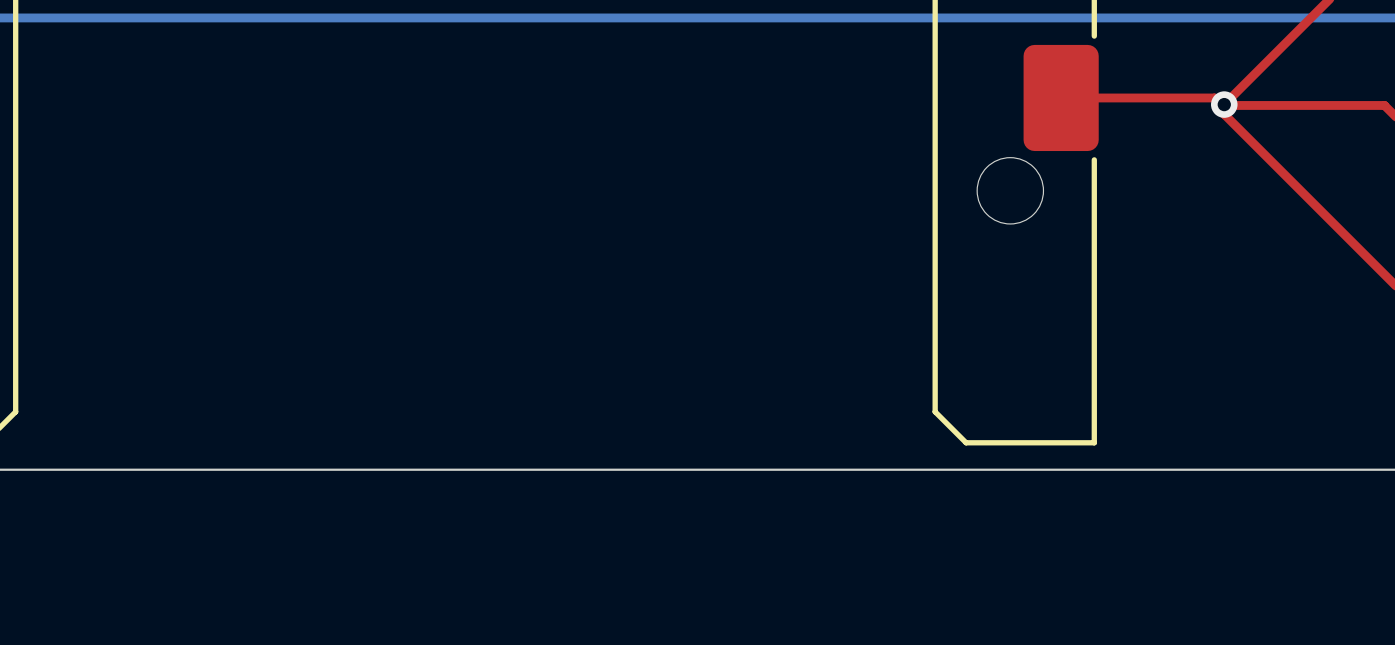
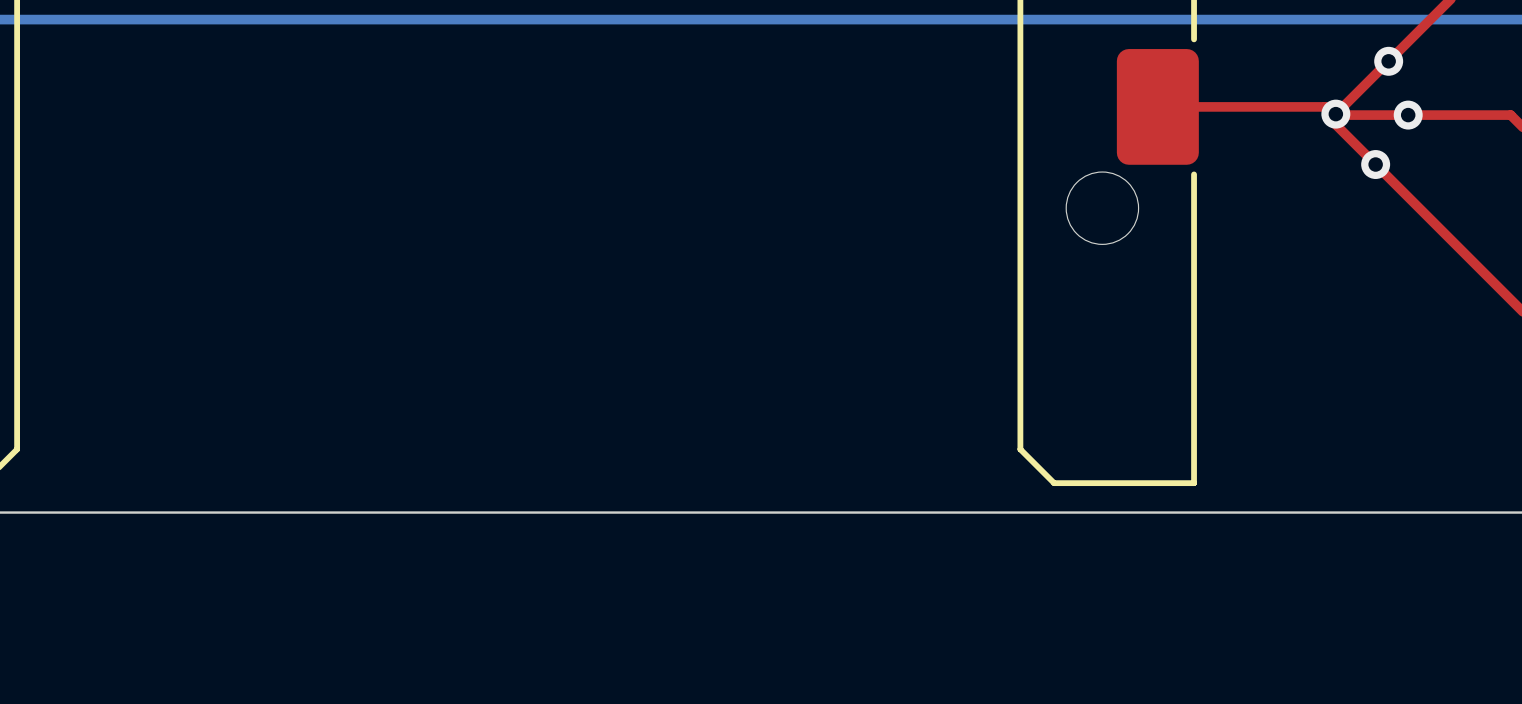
via: none -> (1388, 61)
via: none -> (1408, 115)
via: none -> (1375, 164)

